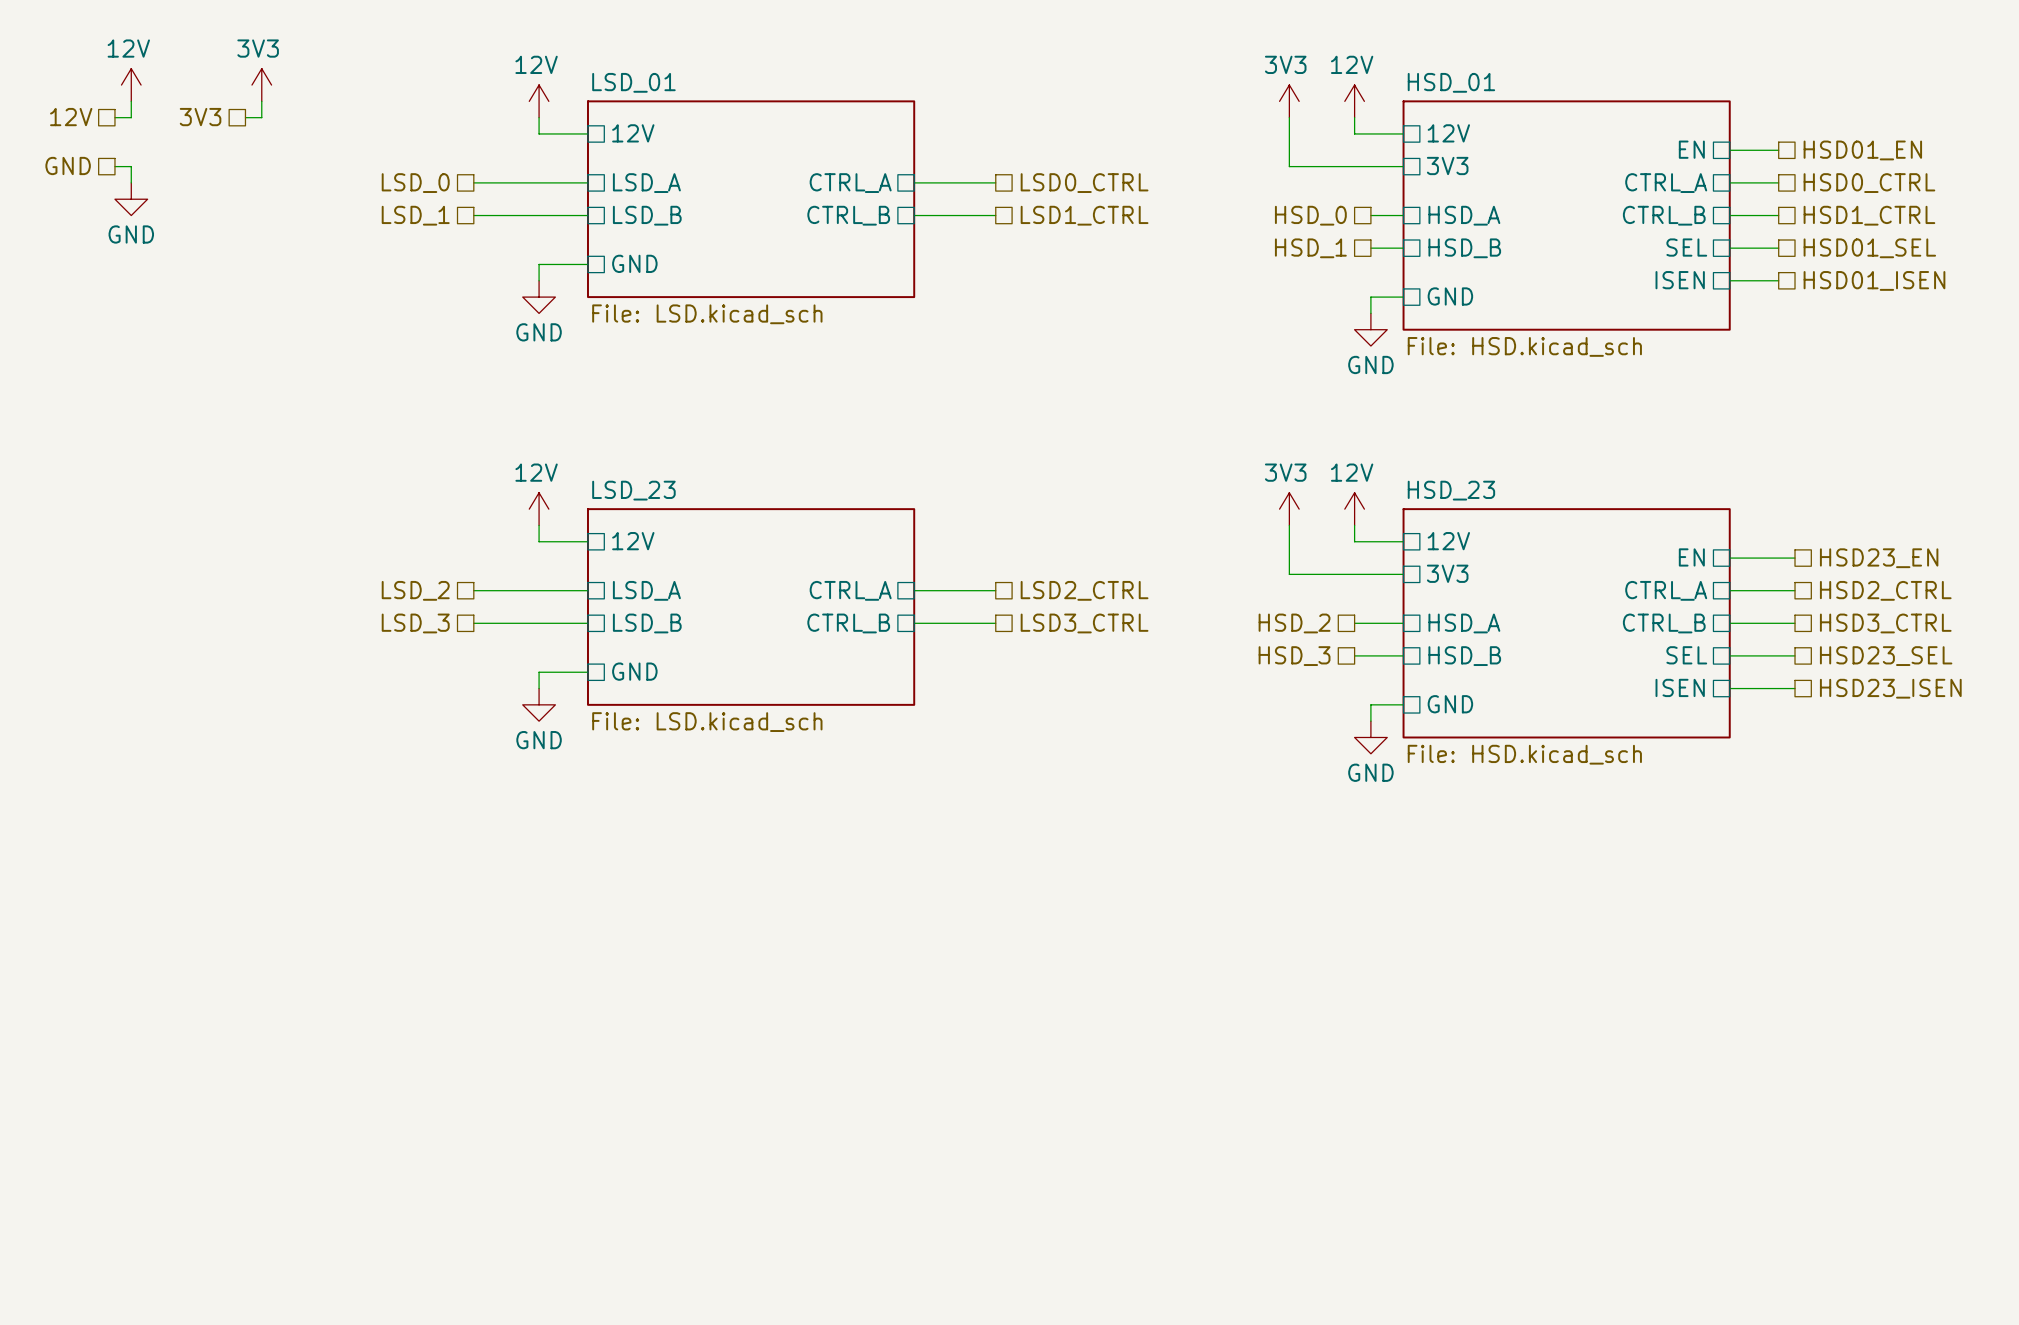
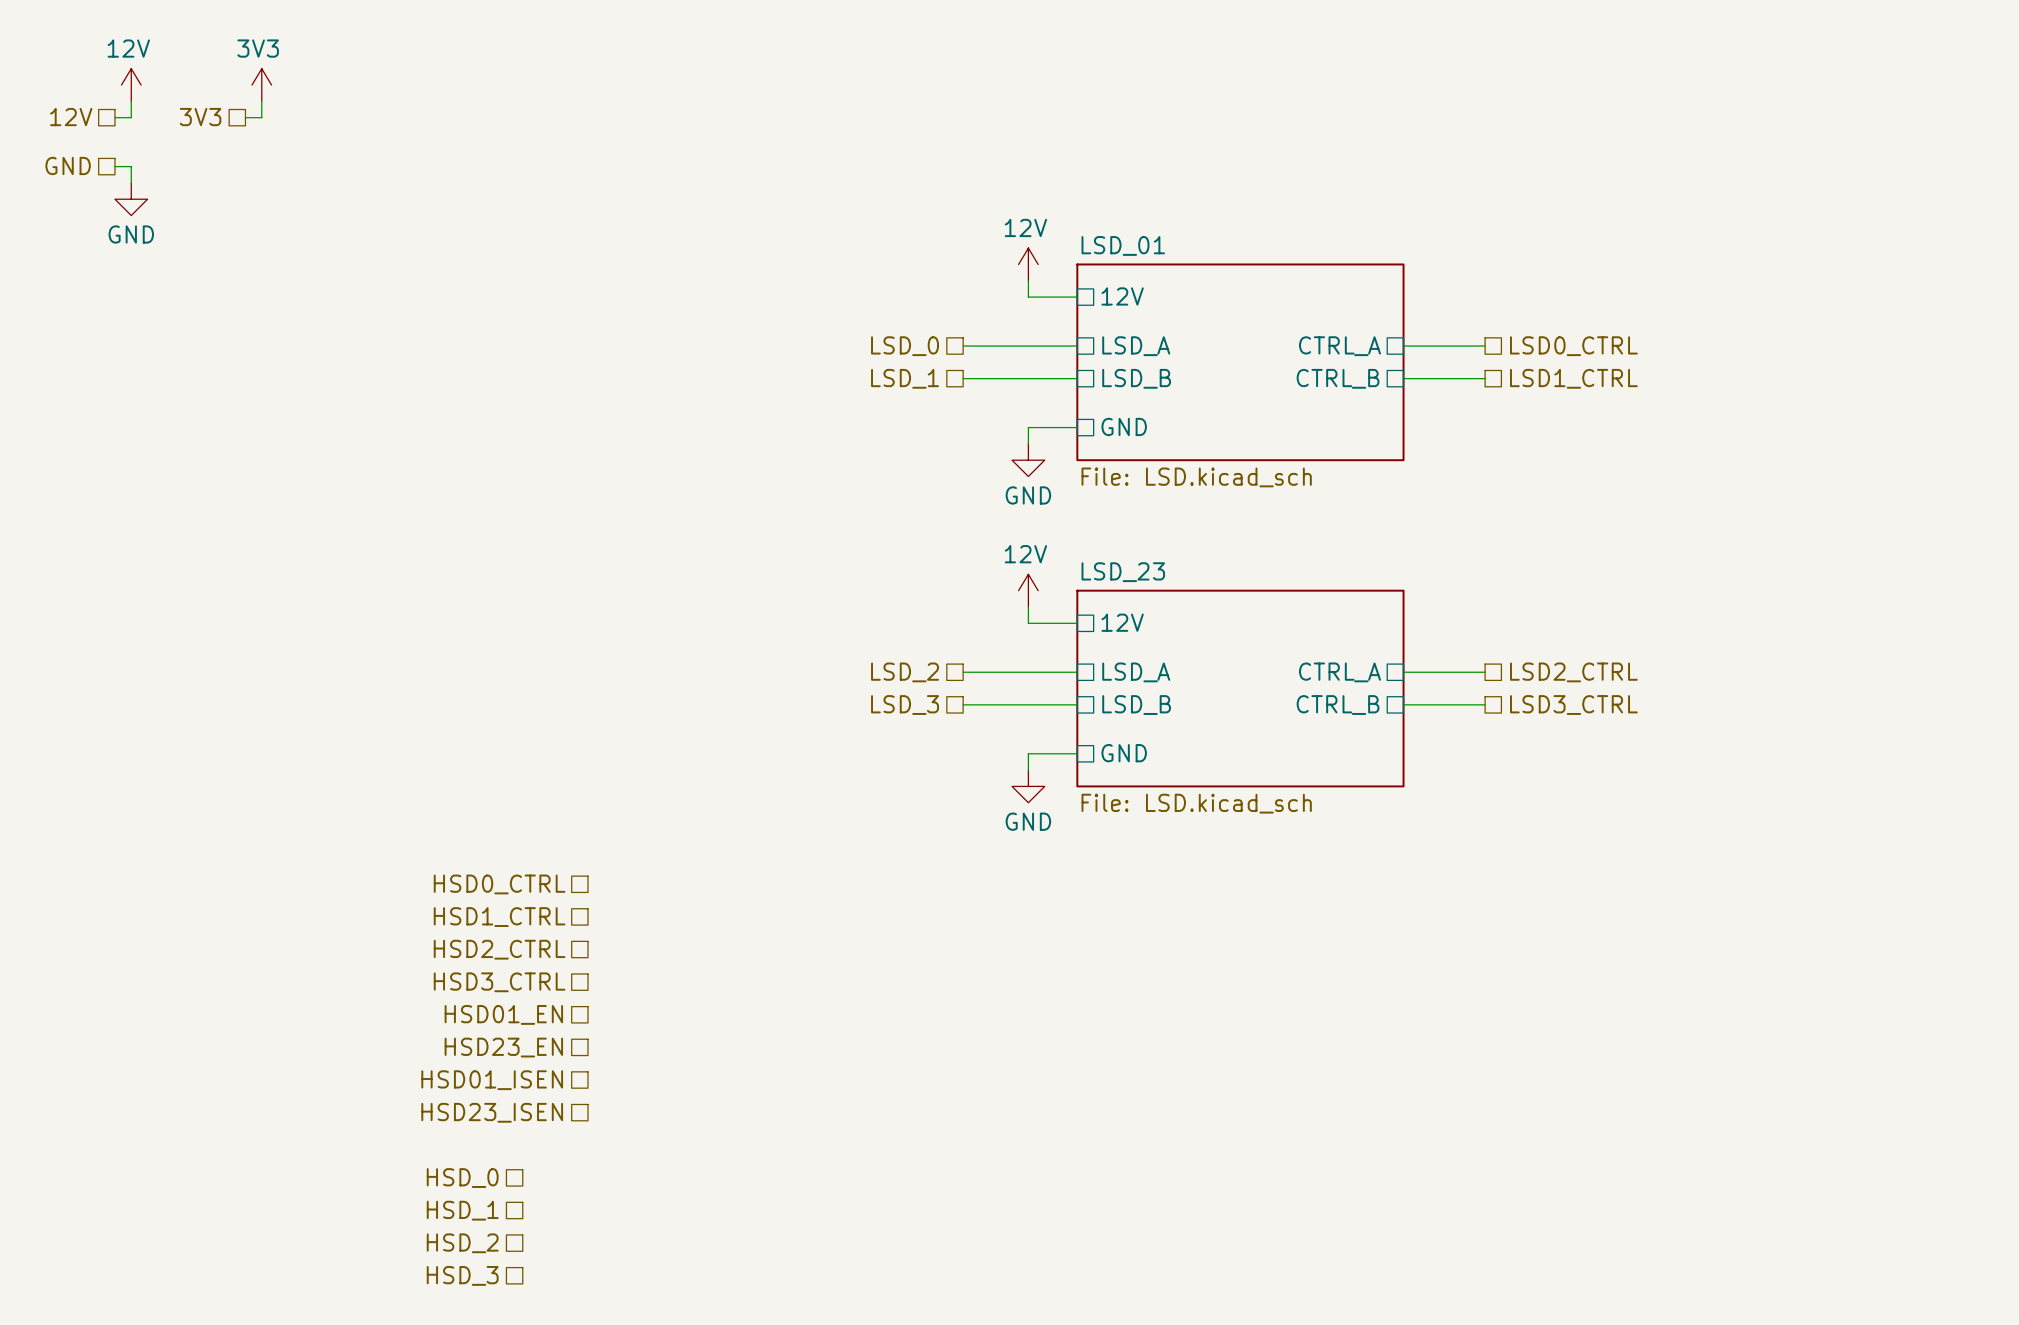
power symbol: 12V (539, 101) -> none
power symbol: 3V3 (1289, 101) -> none
power symbol: 12V (1354, 101) -> none
wire: (539, 117) (539, 133) (587, 133) -> none
wire: (1289, 117) (1289, 166) (1403, 166) -> none
wire: (1354, 117) (1354, 133) (1403, 133) -> none
sheet pin: 12V (633, 133) -> none
sheet pin: 12V (1448, 133) -> none
sheet pin: EN (1691, 149) -> none
wire: (1729, 150) (1778, 150) -> none
hierarchical label: HSD01_EN (1862, 150) -> none
sheet pin: 3V3 (1447, 165) -> none
wire: (473, 182) (587, 182) -> none
wire: (914, 182) (995, 182) -> none
wire: (1729, 182) (1778, 182) -> none
hierarchical label: LSD_0 (415, 183) -> none
sheet pin: LSD_A (646, 183) -> none
sheet pin: CTRL_A (850, 183) -> none
hierarchical label: LSD0_CTRL (1084, 183) -> none
sheet pin: CTRL_A (1666, 183) -> none
hierarchical label: HSD0_CTRL (1869, 183) -> none
sheet LSD_01 position: (751, 199) -> (1240, 362)
hierarchical label: LSD_1 (415, 215) -> none
wire: (473, 215) (587, 215) -> none
sheet pin: LSD_B (647, 215) -> none
sheet pin: CTRL_B (848, 215) -> none
wire: (914, 215) (995, 215) -> none
hierarchical label: LSD1_CTRL (1084, 215) -> none
hierarchical label: HSD_0 (1310, 215) -> none
wire: (1370, 215) (1403, 215) -> none
sheet pin: HSD_A (1464, 215) -> none
sheet HSD_01: File: HSD.kicad_sch (1566, 215) -> none
sheet pin: CTRL_B (1664, 215) -> none
wire: (1729, 215) (1778, 215) -> none
hierarchical label: HSD1_CTRL (1869, 215) -> none
sheet pin: SEL (1686, 247) -> none
hierarchical label: HSD_1 (1310, 248) -> none
wire: (1370, 248) (1403, 248) -> none
sheet pin: HSD_B (1464, 248) -> none
wire: (1729, 248) (1778, 248) -> none
hierarchical label: HSD01_SEL (1869, 248) -> none
sheet pin: GND (634, 263) -> none
wire: (587, 264) (539, 264) (539, 280) -> none
power symbol: none -> 12V (1028, 264)
wire: none -> (1028, 280) (1028, 297) (1077, 297)
sheet pin: ISEN (1680, 280) -> none
wire: (1729, 280) (1778, 280) -> none
hierarchical label: HSD01_ISEN (1874, 280) -> none
sheet pin: none -> 12V (1122, 296)
sheet pin: GND (1450, 296) -> none
power symbol: GND (539, 297) -> none
wire: (1403, 297) (1370, 297) (1370, 313) -> none
power symbol: GND (1370, 329) -> none
hierarchical label: none -> LSD_0 (905, 346)
wire: none -> (963, 346) (1077, 346)
sheet pin: none -> LSD_A (1136, 346)
sheet pin: none -> CTRL_A (1339, 346)
wire: none -> (1403, 346) (1485, 346)
hierarchical label: none -> LSD0_CTRL (1573, 346)
hierarchical label: none -> LSD_1 (905, 378)
wire: none -> (963, 378) (1077, 378)
sheet pin: none -> LSD_B (1136, 378)
sheet pin: none -> CTRL_B (1338, 378)
wire: none -> (1403, 378) (1485, 378)
hierarchical label: none -> LSD1_CTRL (1573, 378)
sheet pin: none -> GND (1124, 426)
wire: none -> (1077, 427) (1028, 427) (1028, 443)
power symbol: none -> GND (1028, 460)
power symbol: 12V (539, 509) -> none
power symbol: 3V3 (1289, 509) -> none
power symbol: 12V (1354, 509) -> none
wire: (539, 525) (539, 541) (587, 541) -> none
wire: (1289, 525) (1289, 574) (1403, 574) -> none
wire: (1354, 525) (1354, 541) (1403, 541) -> none
sheet pin: 12V (633, 541) -> none
sheet pin: 12V (1448, 541) -> none
sheet pin: EN (1691, 557) -> none
wire: (1729, 558) (1795, 558) -> none
hierarchical label: HSD23_EN (1879, 558) -> none
sheet pin: 3V3 (1447, 573) -> none
hierarchical label: LSD_2 (415, 590) -> none
wire: (473, 590) (587, 590) -> none
sheet pin: LSD_A (646, 590) -> none
sheet pin: CTRL_A (850, 590) -> none
wire: (914, 590) (995, 590) -> none
power symbol: none -> 12V (1028, 590)
hierarchical label: LSD2_CTRL (1084, 590) -> none
sheet pin: CTRL_A (1666, 590) -> none
wire: (1729, 590) (1795, 590) -> none
hierarchical label: HSD2_CTRL (1885, 590) -> none
sheet LSD_23 position: (751, 606) -> (1240, 688)
wire: none -> (1028, 606) (1028, 623) (1077, 623)
sheet pin: none -> 12V (1122, 622)
hierarchical label: LSD_3 (415, 623) -> none
wire: (473, 623) (587, 623) -> none
sheet pin: LSD_B (647, 623) -> none
sheet pin: CTRL_B (848, 623) -> none
wire: (914, 623) (995, 623) -> none
hierarchical label: LSD3_CTRL (1084, 623) -> none
hierarchical label: HSD_2 (1294, 623) -> none
wire: (1354, 623) (1403, 623) -> none
sheet pin: HSD_A (1464, 623) -> none
sheet HSD_23: File: HSD.kicad_sch (1566, 623) -> none
sheet pin: CTRL_B (1664, 623) -> none
wire: (1729, 623) (1795, 623) -> none
hierarchical label: HSD3_CTRL (1885, 623) -> none
wire: (1354, 655) (1403, 655) -> none
sheet pin: SEL (1686, 655) -> none
wire: (1729, 655) (1795, 655) -> none
hierarchical label: HSD_3 (1294, 656) -> none
sheet pin: HSD_B (1464, 656) -> none
hierarchical label: HSD23_SEL (1886, 656) -> none
sheet pin: GND (634, 671) -> none
wire: (587, 672) (539, 672) (539, 688) -> none
hierarchical label: none -> LSD_2 (905, 672)
wire: none -> (963, 672) (1077, 672)
sheet pin: none -> LSD_A (1136, 672)
sheet pin: none -> CTRL_A (1339, 672)
wire: none -> (1403, 672) (1485, 672)
hierarchical label: none -> LSD2_CTRL (1573, 672)
sheet pin: ISEN (1680, 687) -> none
wire: (1729, 688) (1795, 688) -> none
hierarchical label: HSD23_ISEN (1890, 688) -> none
power symbol: GND (539, 704) -> none
wire: none -> (963, 704) (1077, 704)
wire: (1403, 704) (1370, 704) (1370, 721) -> (1403, 704) (1485, 704)
sheet pin: GND (1450, 704) -> none
hierarchical label: none -> LSD_3 (905, 705)
sheet pin: none -> LSD_B (1136, 705)
sheet pin: none -> CTRL_B (1338, 705)
hierarchical label: none -> LSD3_CTRL (1573, 705)
power symbol: GND (1370, 737) -> none
wire: none -> (1077, 753) (1028, 753) (1028, 770)
sheet pin: none -> GND (1124, 753)
power symbol: none -> GND (1028, 786)
hierarchical label: none -> HSD0_CTRL (499, 884)
hierarchical label: none -> HSD1_CTRL (499, 917)
hierarchical label: none -> HSD2_CTRL (499, 949)
hierarchical label: none -> HSD3_CTRL (499, 982)
hierarchical label: none -> HSD01_EN (503, 1014)
hierarchical label: none -> HSD23_EN (503, 1047)
hierarchical label: none -> HSD01_ISEN (492, 1080)
hierarchical label: none -> HSD23_ISEN (492, 1112)
hierarchical label: none -> HSD_0 (462, 1178)
hierarchical label: none -> HSD_1 (462, 1210)
hierarchical label: none -> HSD_2 (462, 1243)
hierarchical label: none -> HSD_3 (462, 1275)

